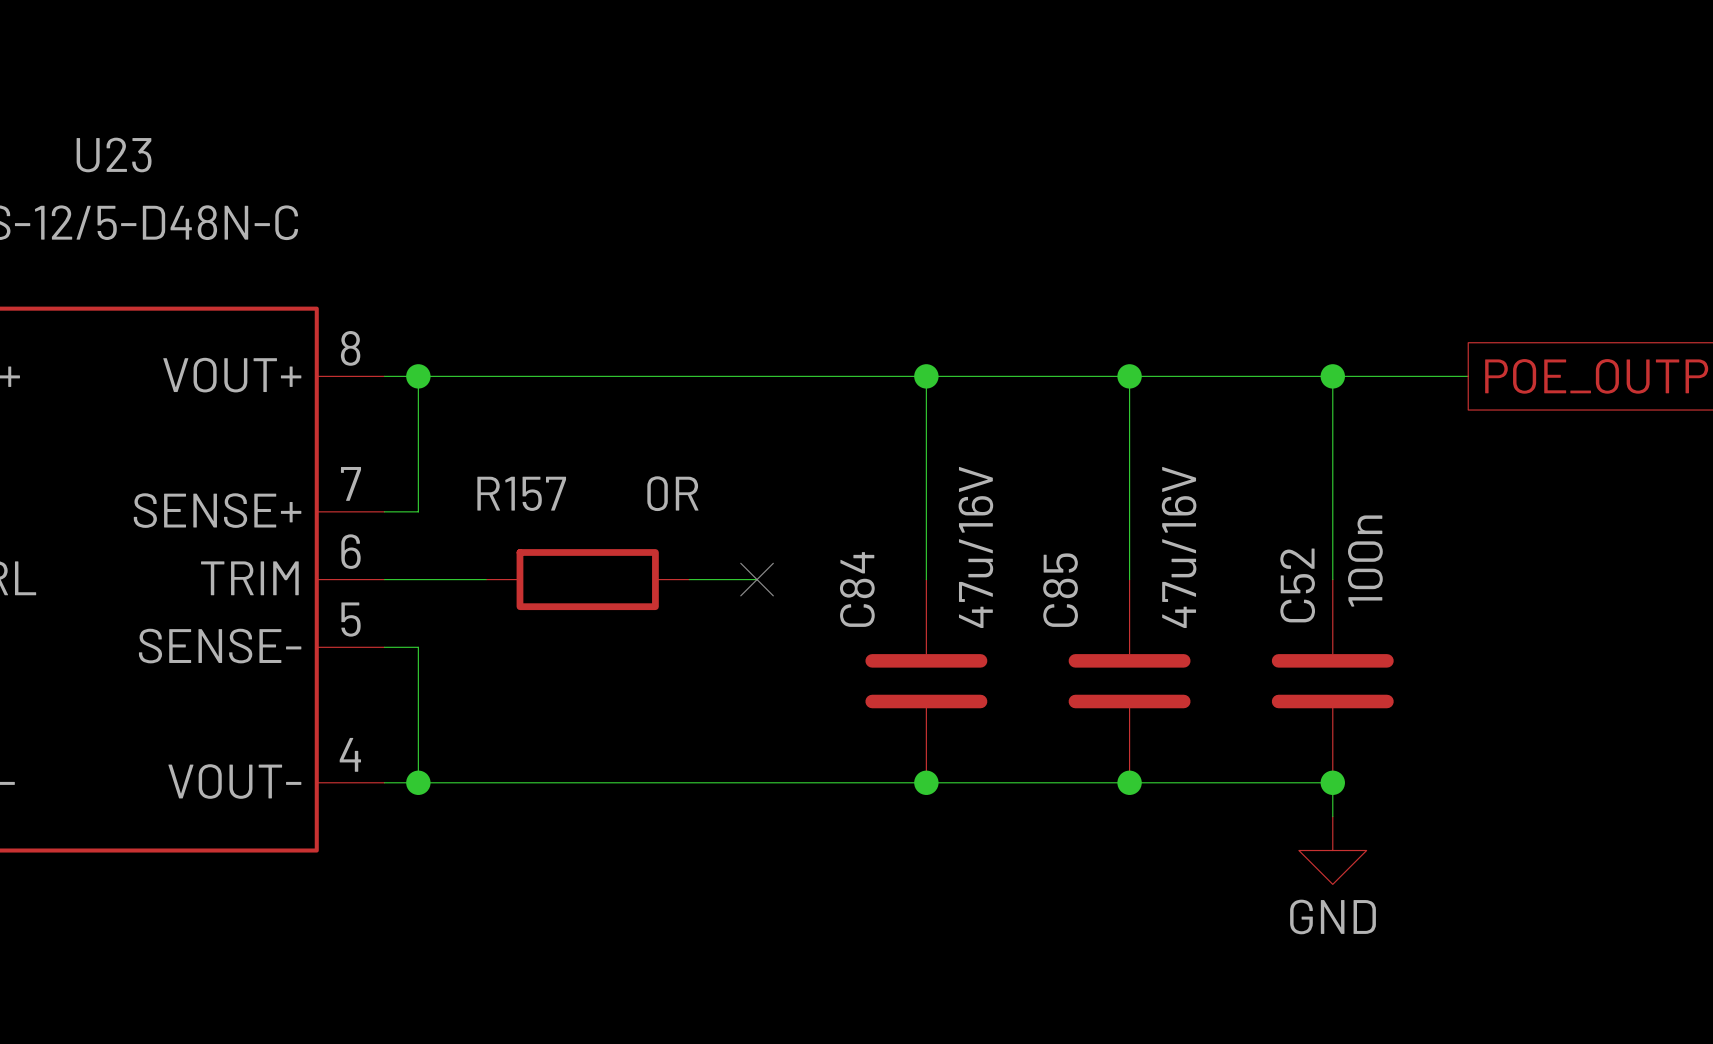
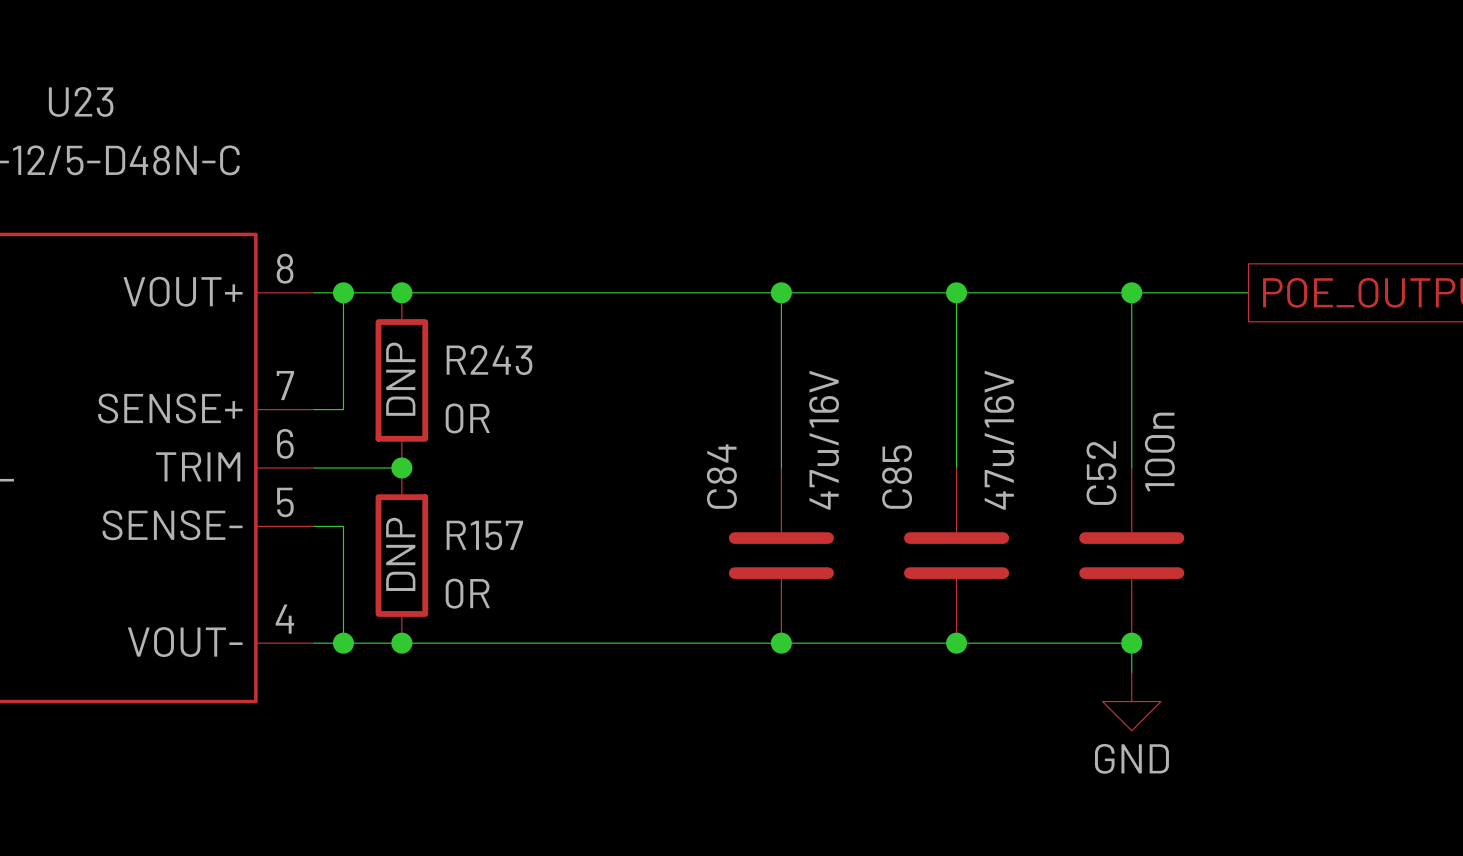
junction: none -> (401, 292)
R243: none -> (401, 380)
R157 name position: R157 (521, 493) -> R157 (484, 535)
junction: none -> (401, 467)
R157 rotation: 0° (587, 579) -> 90° clockwise (401, 555)
R157 position: (587, 579) -> (401, 555)
wire: (689, 579) (757, 579) -> none
no-connect mark: (757, 579) -> none
R157 text: none -> DNP (400, 554)
junction: none -> (401, 643)

